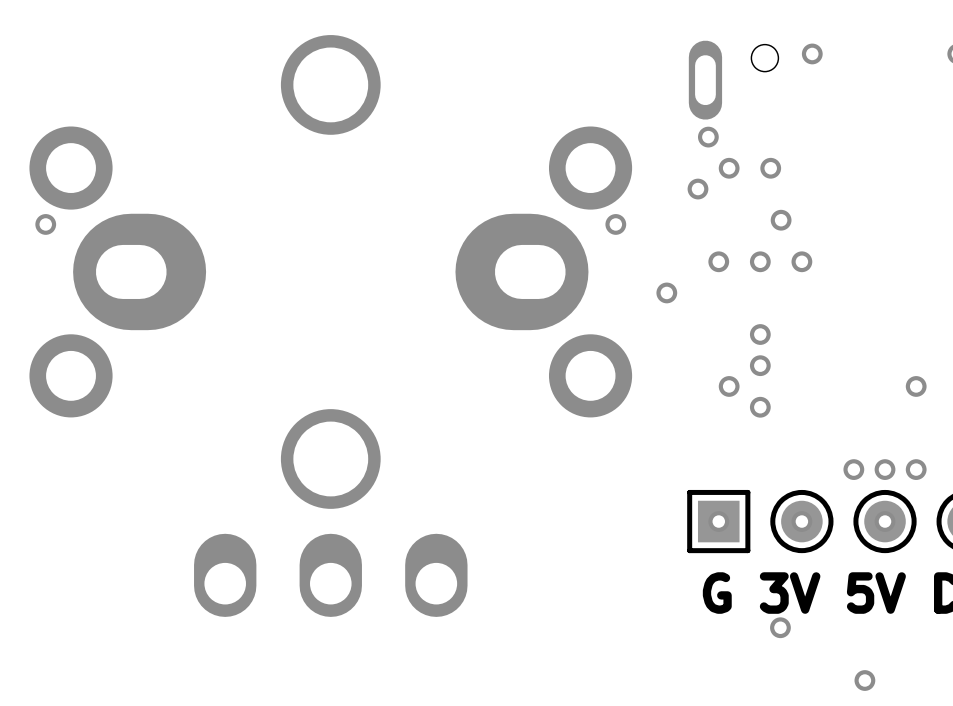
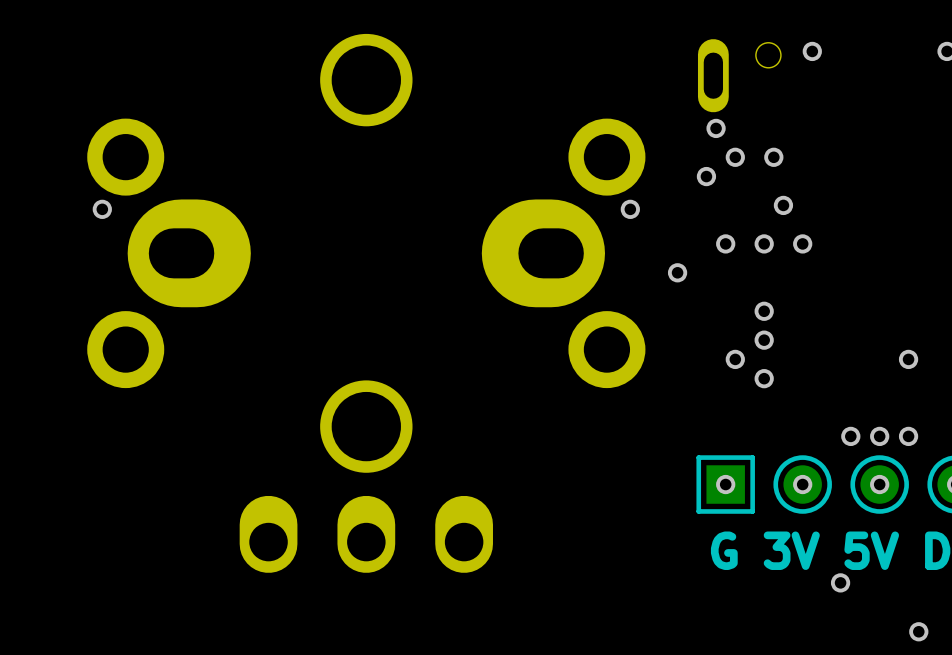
via: (780, 627) -> none
via: none -> (840, 582)
via: (864, 680) -> none
via: none -> (918, 631)

